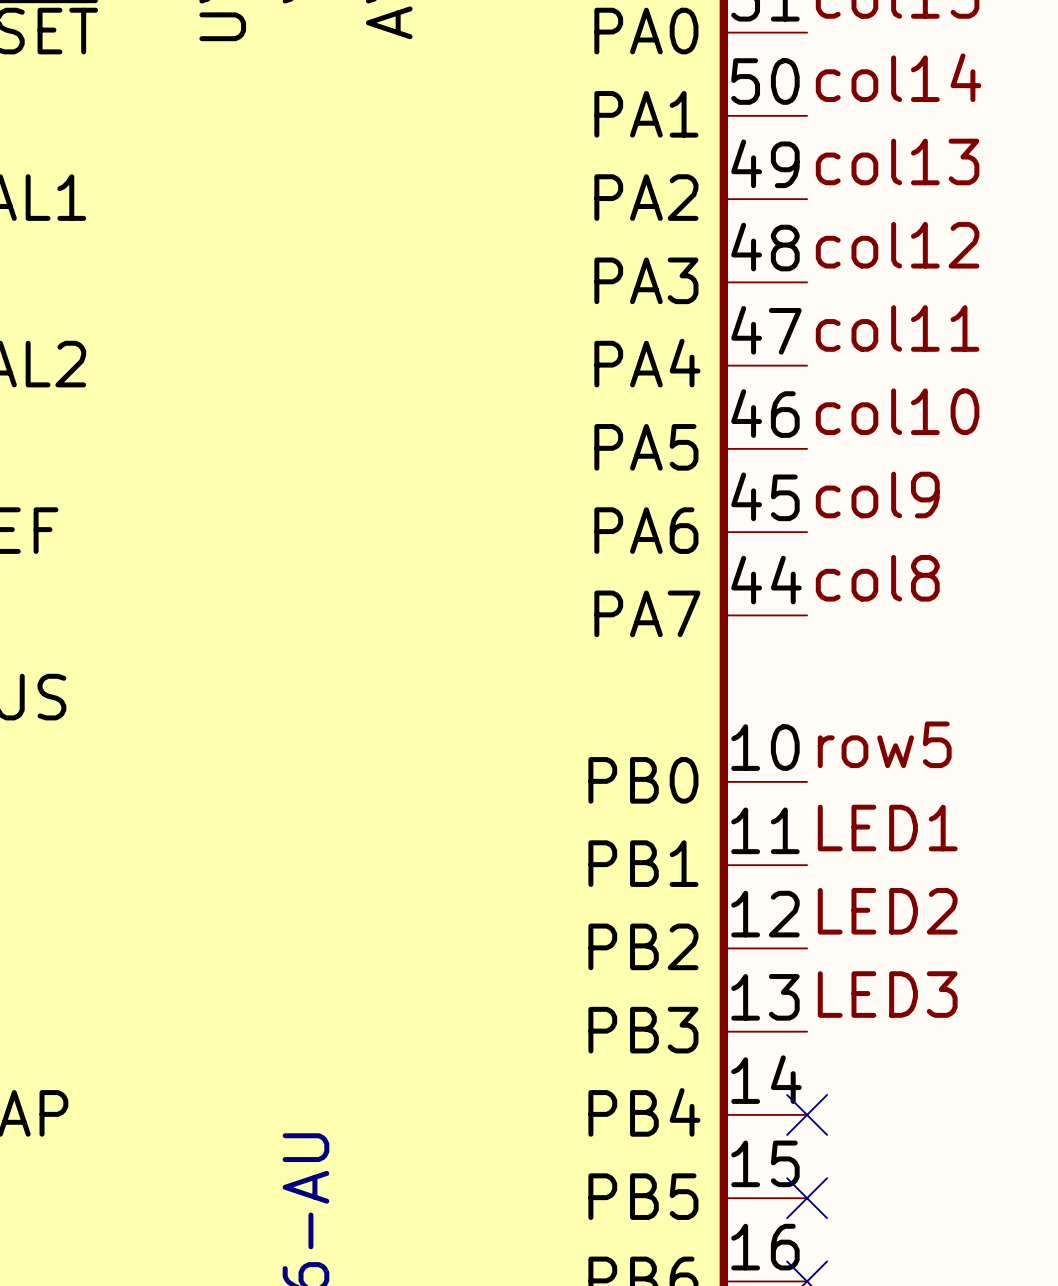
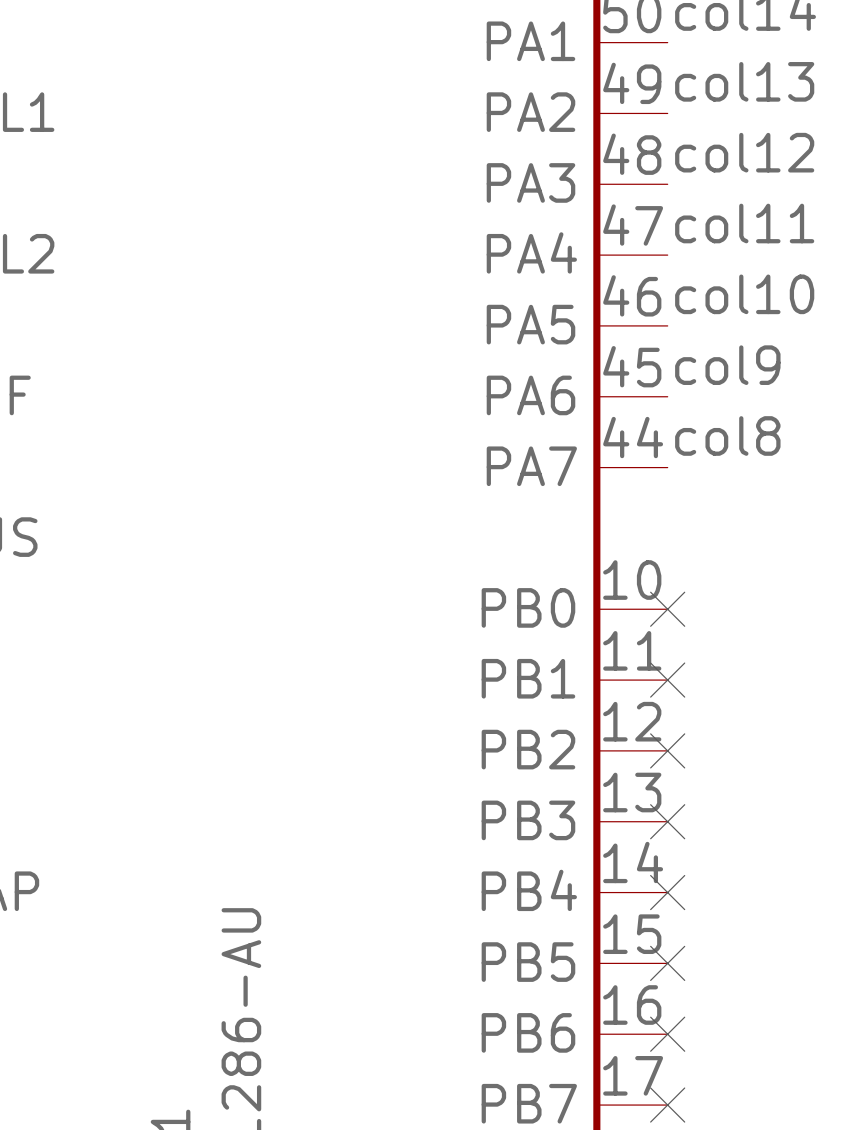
label: row5 (884, 744) -> none
no-connect mark: none -> (667, 609)
label: LED1 (887, 828) -> none
no-connect mark: none -> (667, 680)
label: LED2 (887, 911) -> none
no-connect mark: none -> (667, 750)
label: LED3 (887, 994) -> none
no-connect mark: none -> (667, 821)

